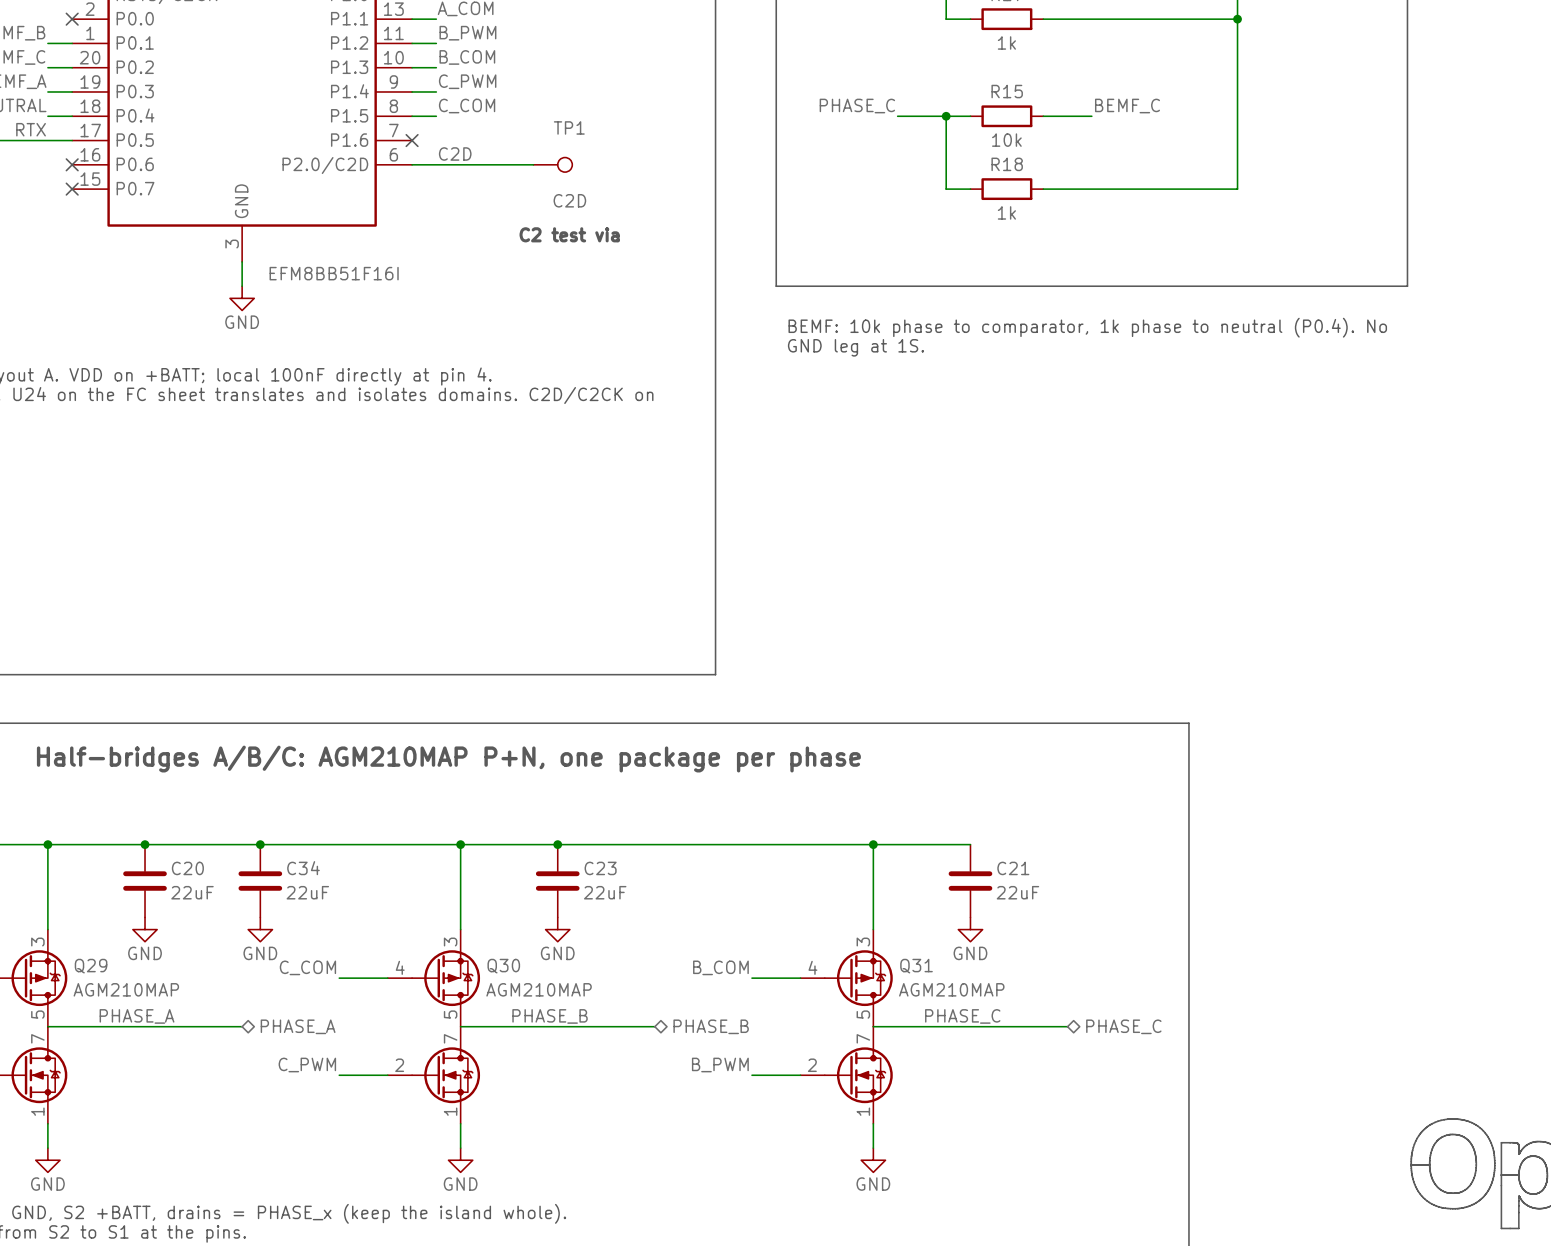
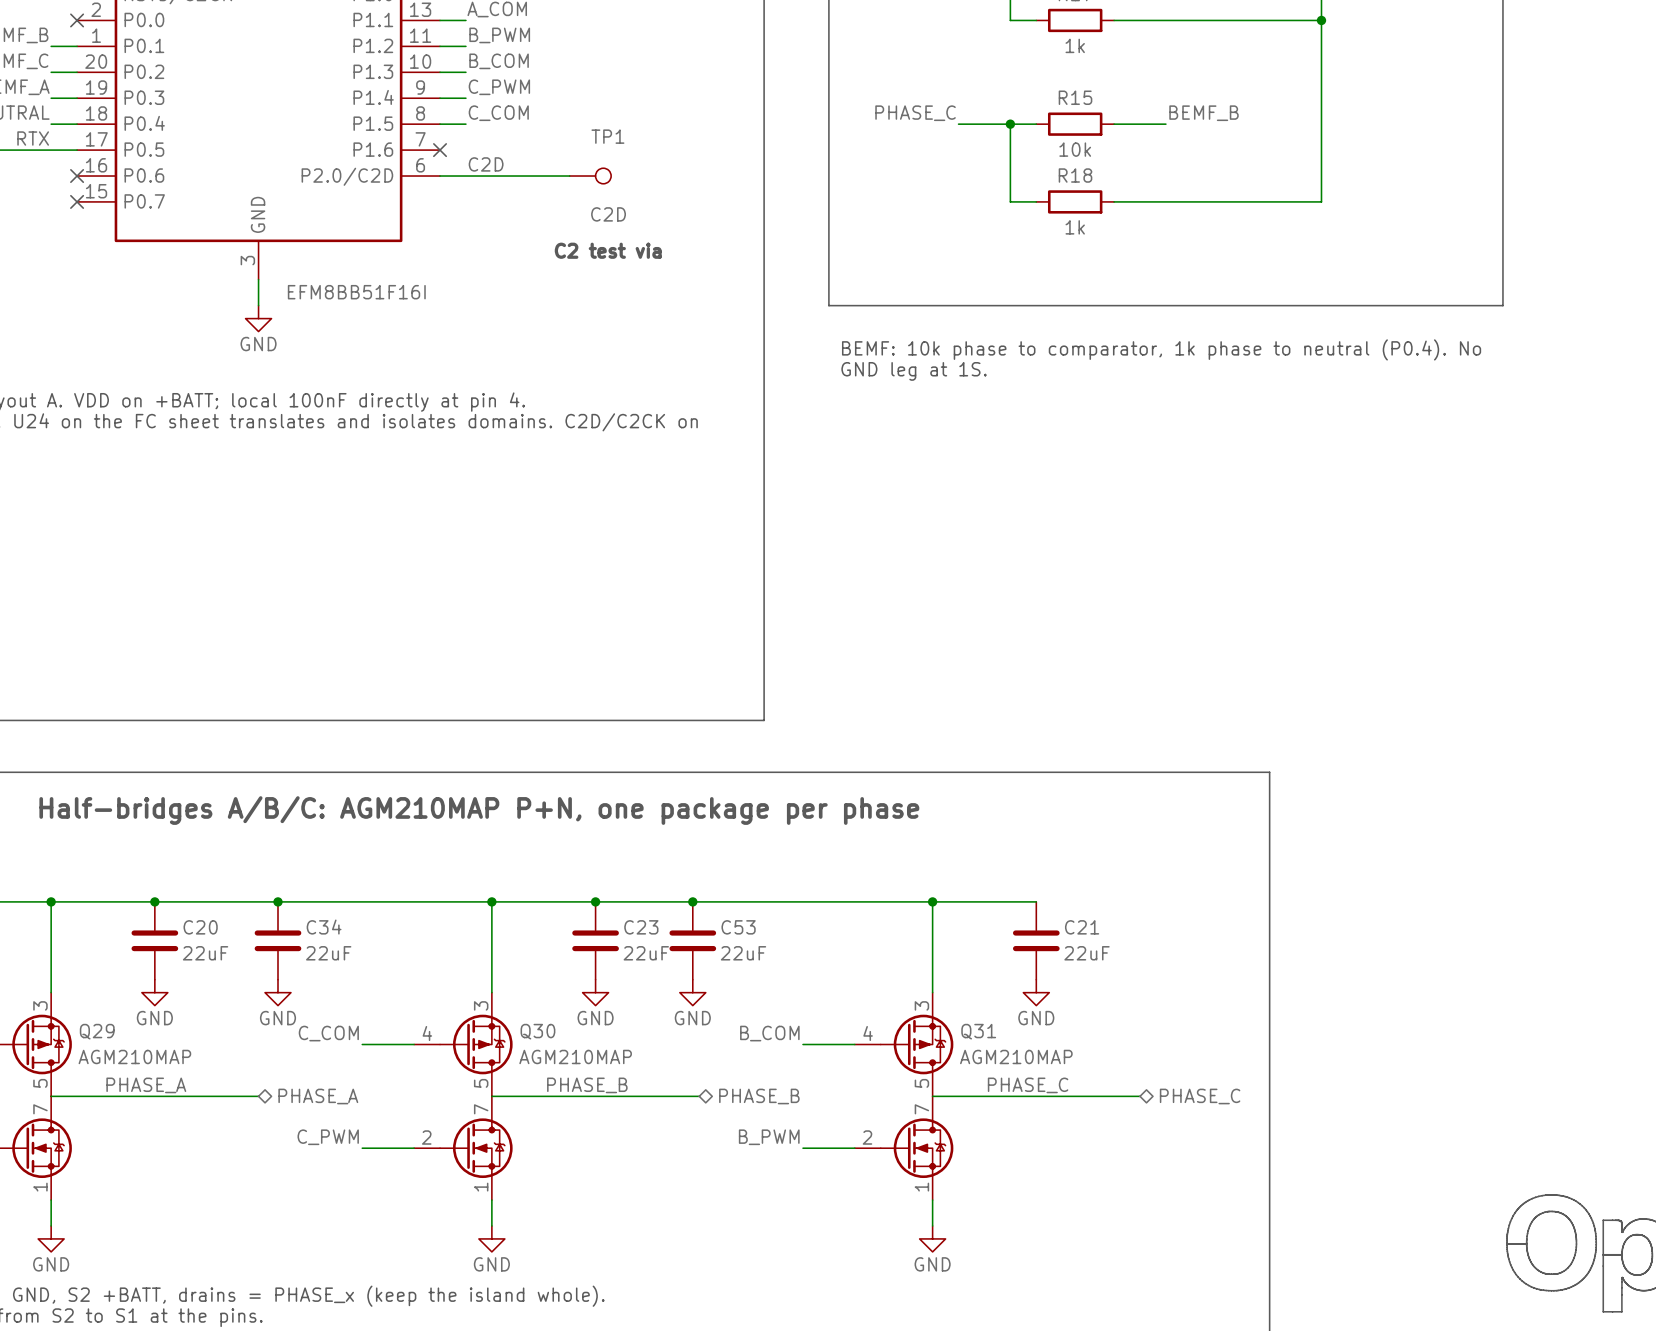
label: BEMF_C (1127, 106) -> BEMF_B (1204, 113)
junction: none -> (692, 901)
C53: none -> 22uF (692, 940)
power symbol: none -> GND (692, 992)

